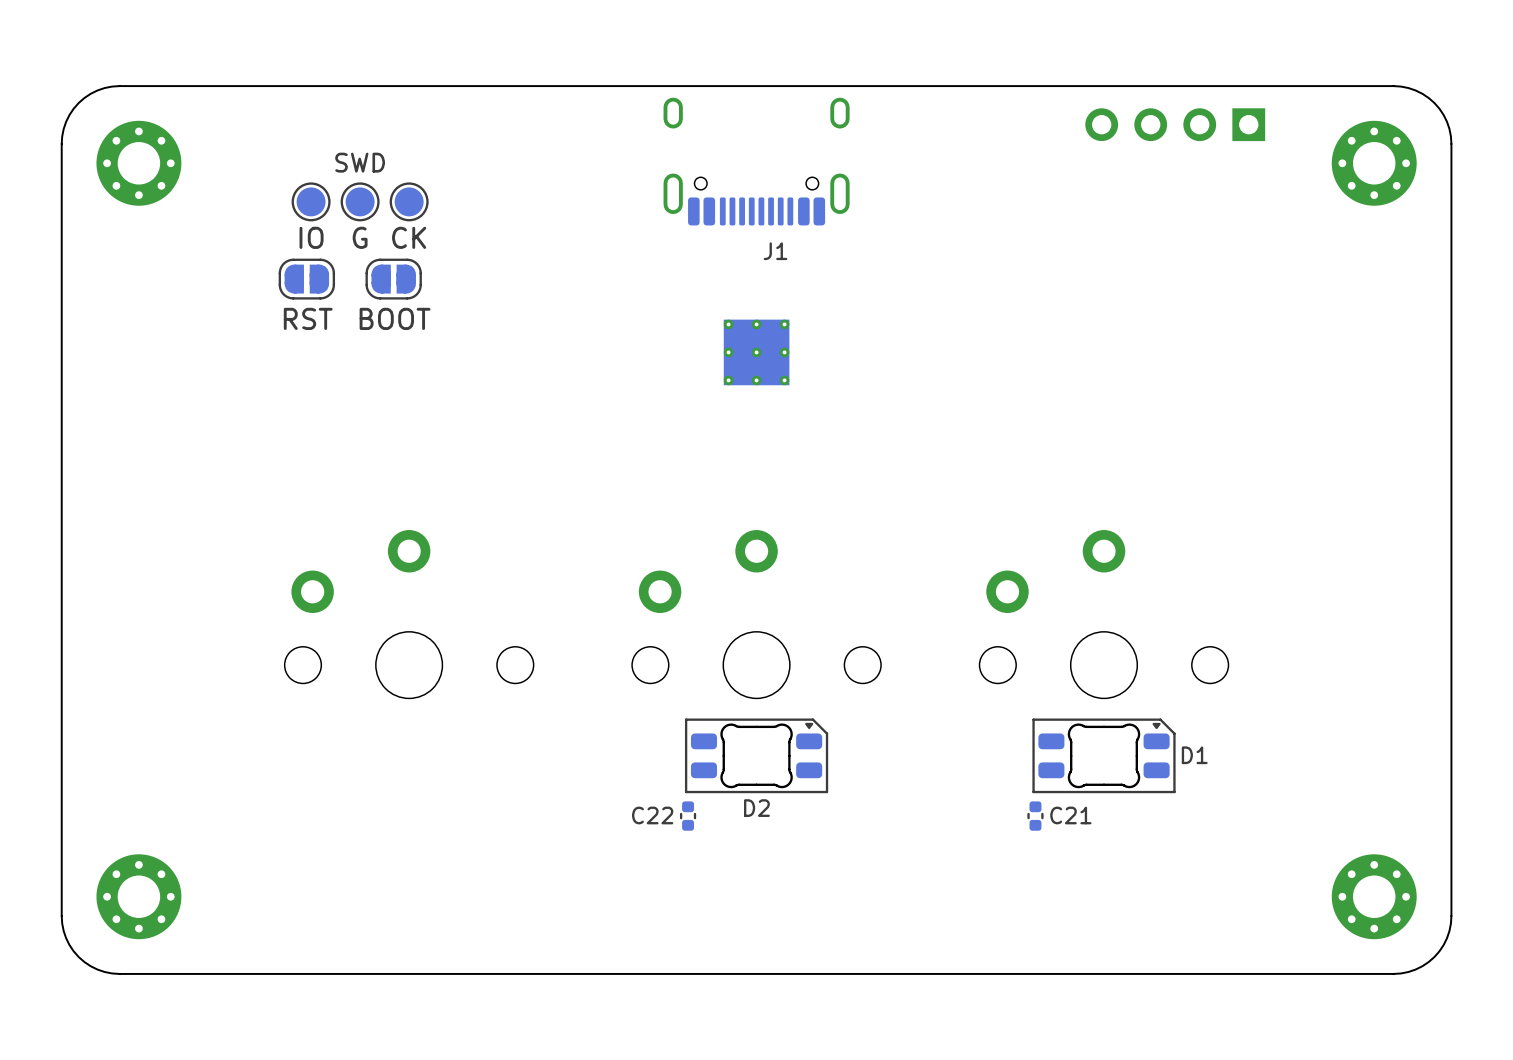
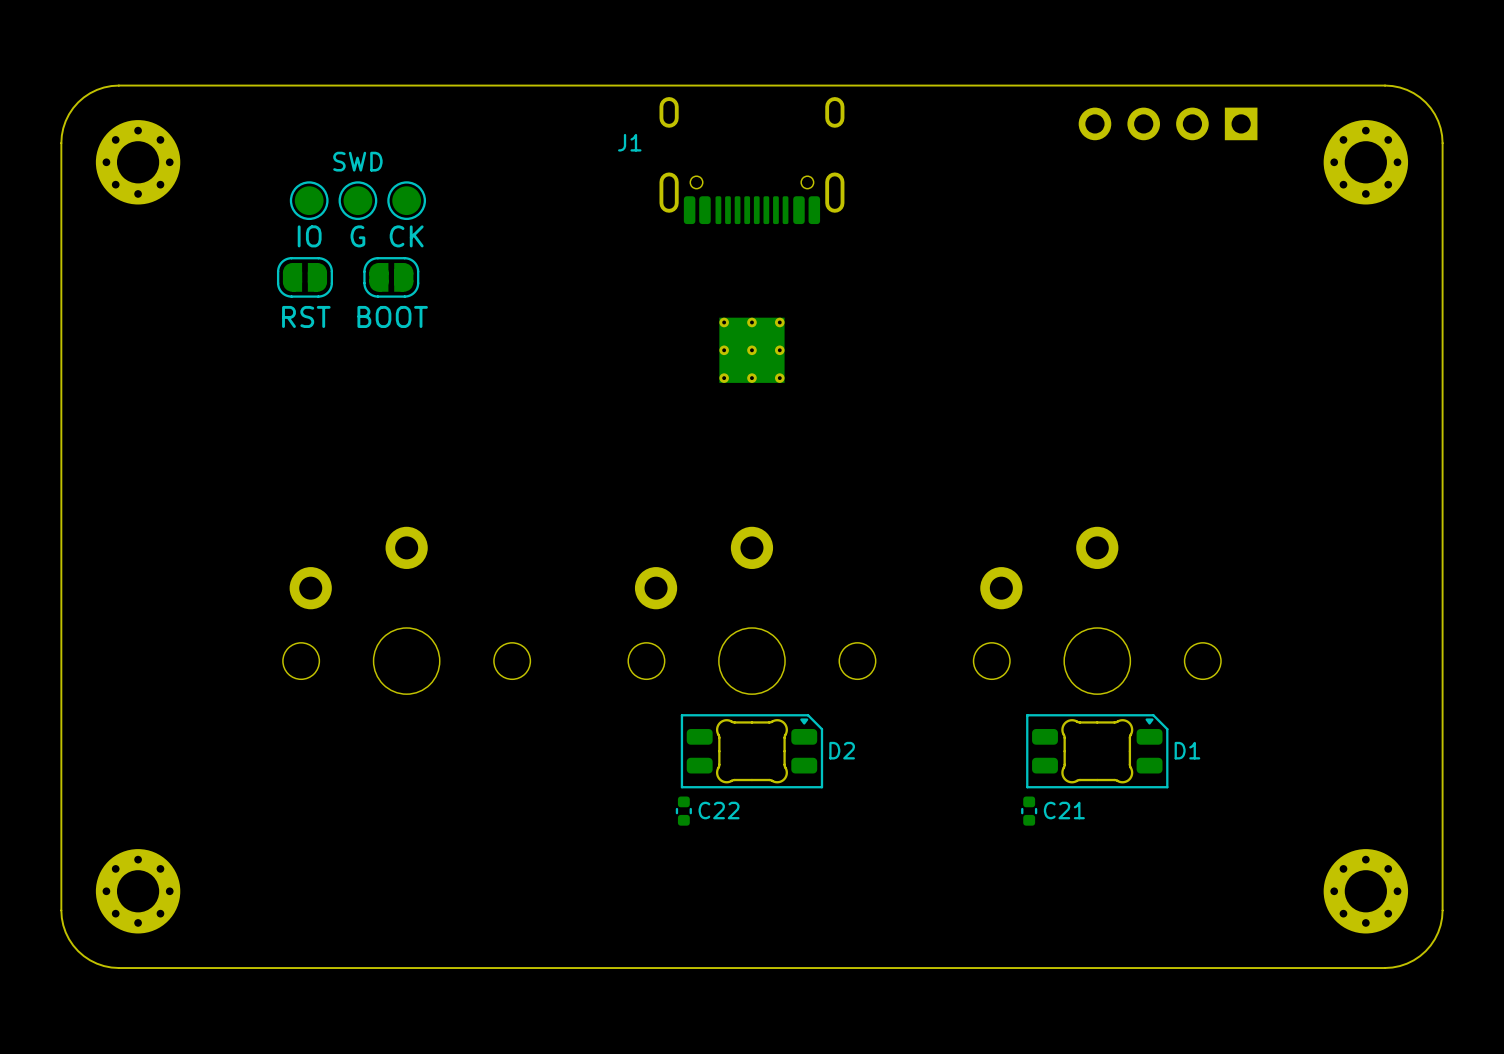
J1 name position: J1 (775, 251) -> J1 (629, 142)
D2 name position: D2 (756, 808) -> D2 (842, 750)
C22 name position: C22 (652, 815) -> C22 (719, 810)

